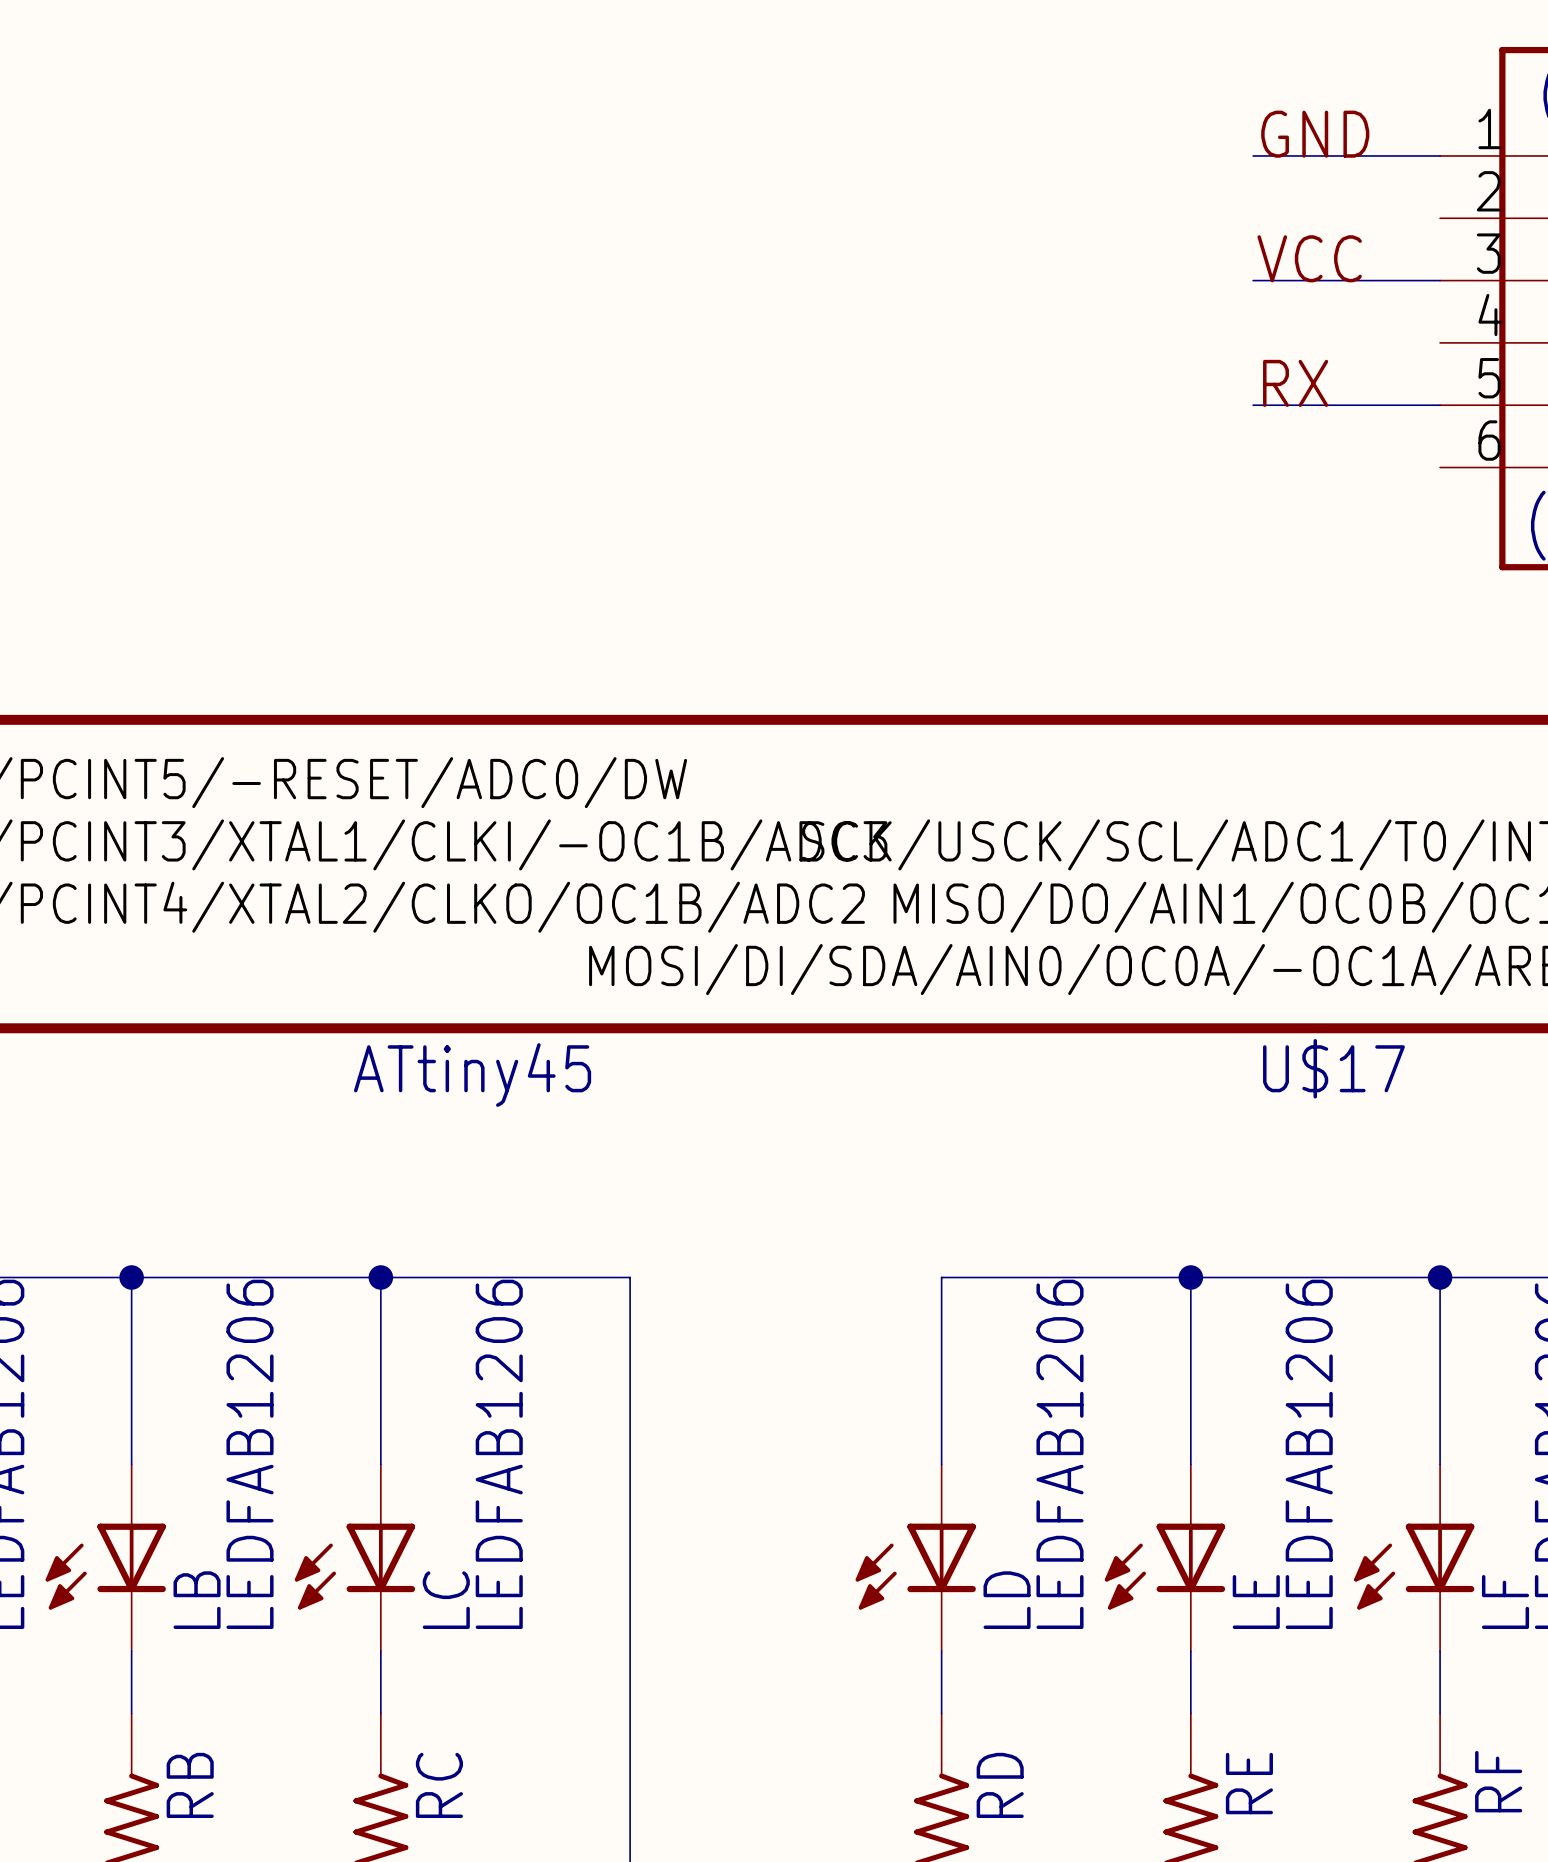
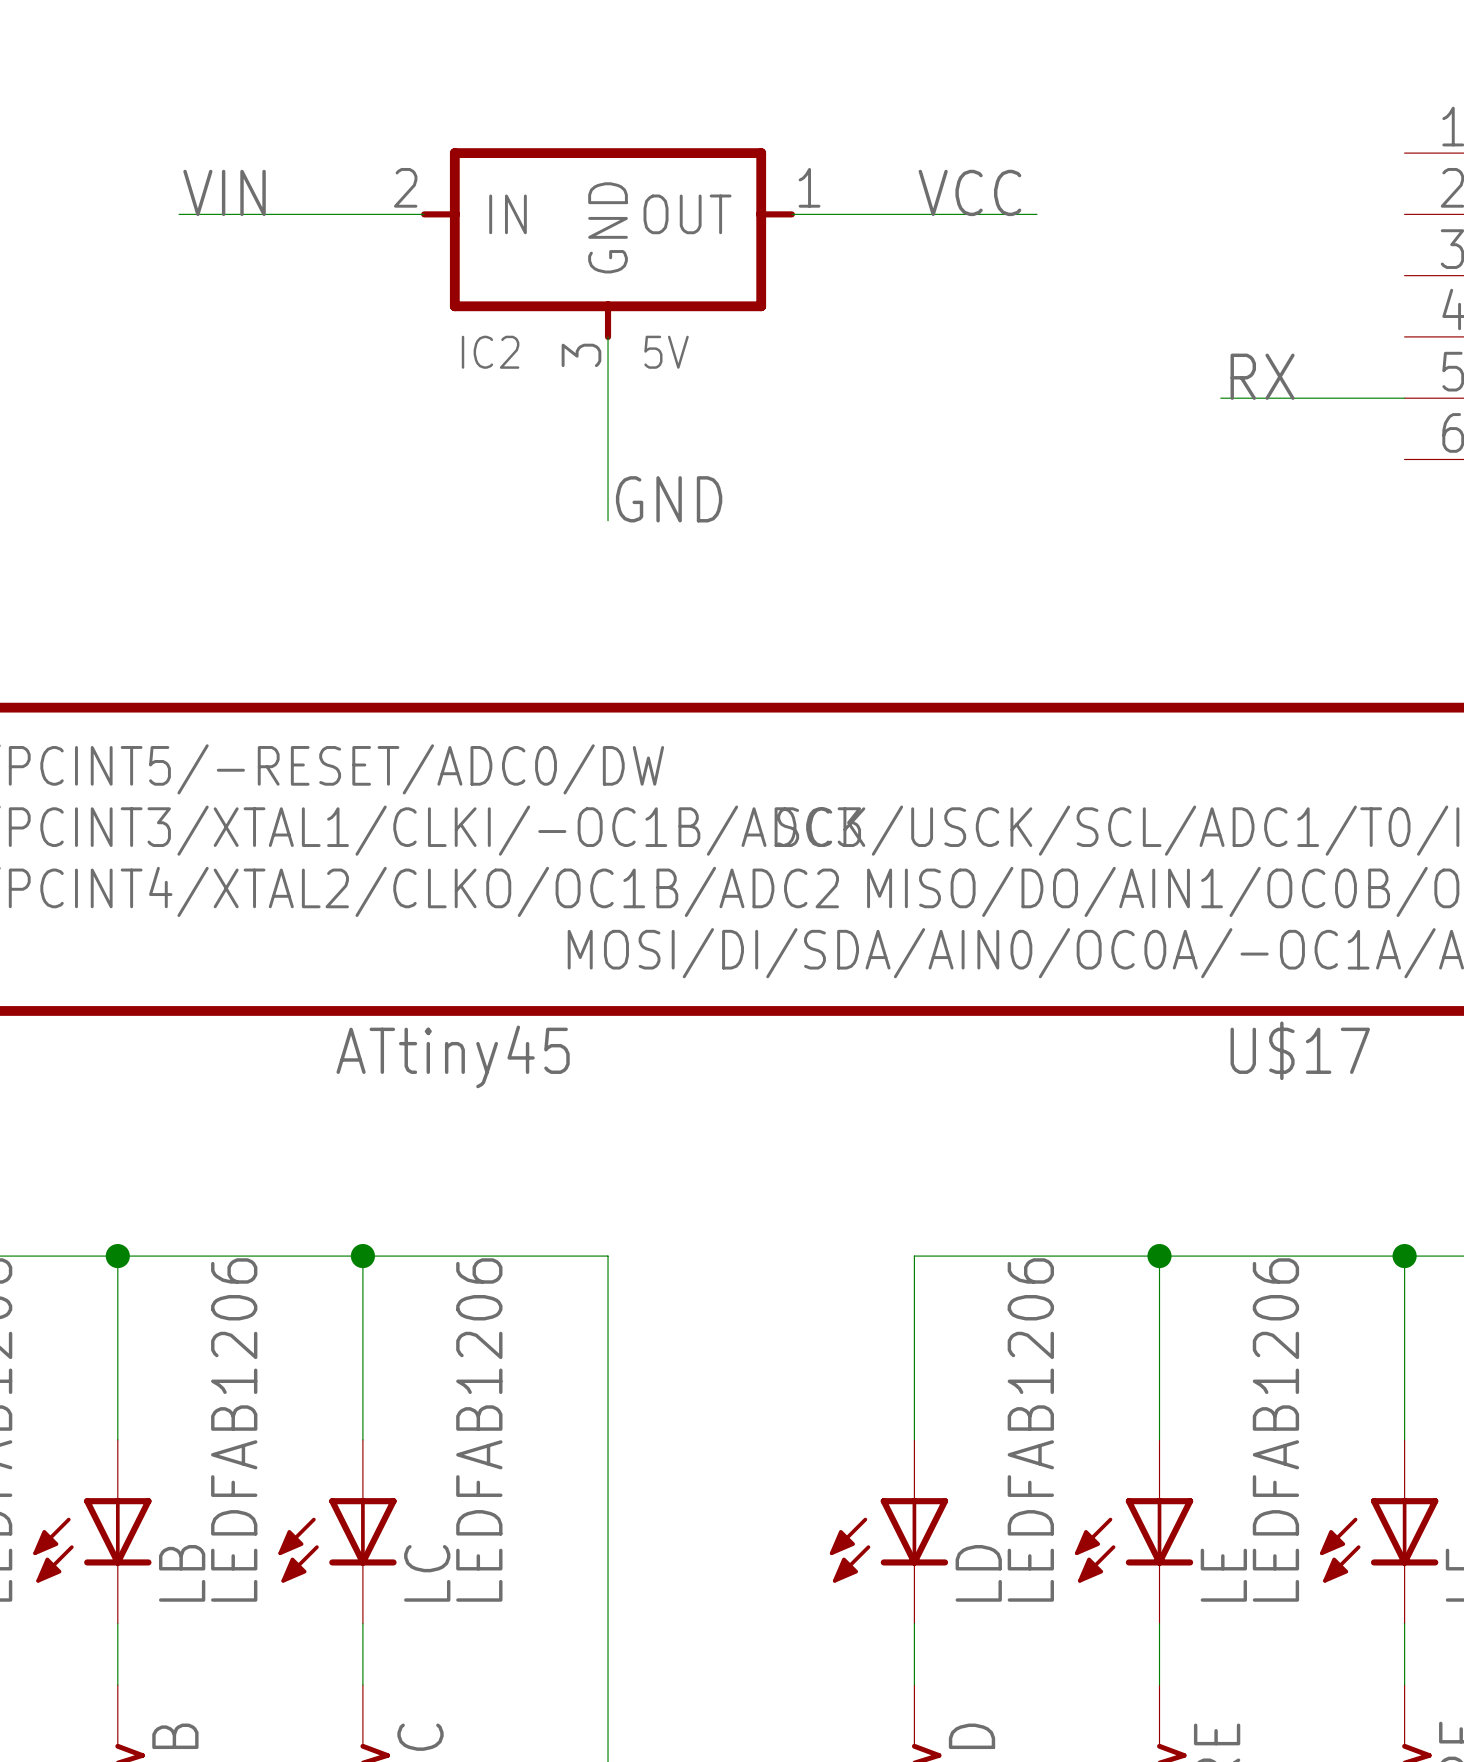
label: GND (1315, 134) -> none
wire: (1253, 155) (1440, 155) -> none
label: none -> VIN (224, 192)
wire: none -> (179, 214) (424, 214)
wire: none -> (791, 214) (1036, 214)
IC2: none -> 5V (608, 244)
label position: VCC (1309, 258) -> VCC (969, 192)
wire: (1253, 280) (1440, 280) -> none
wire: none -> (608, 336) (608, 520)
label: none -> GND (669, 499)

